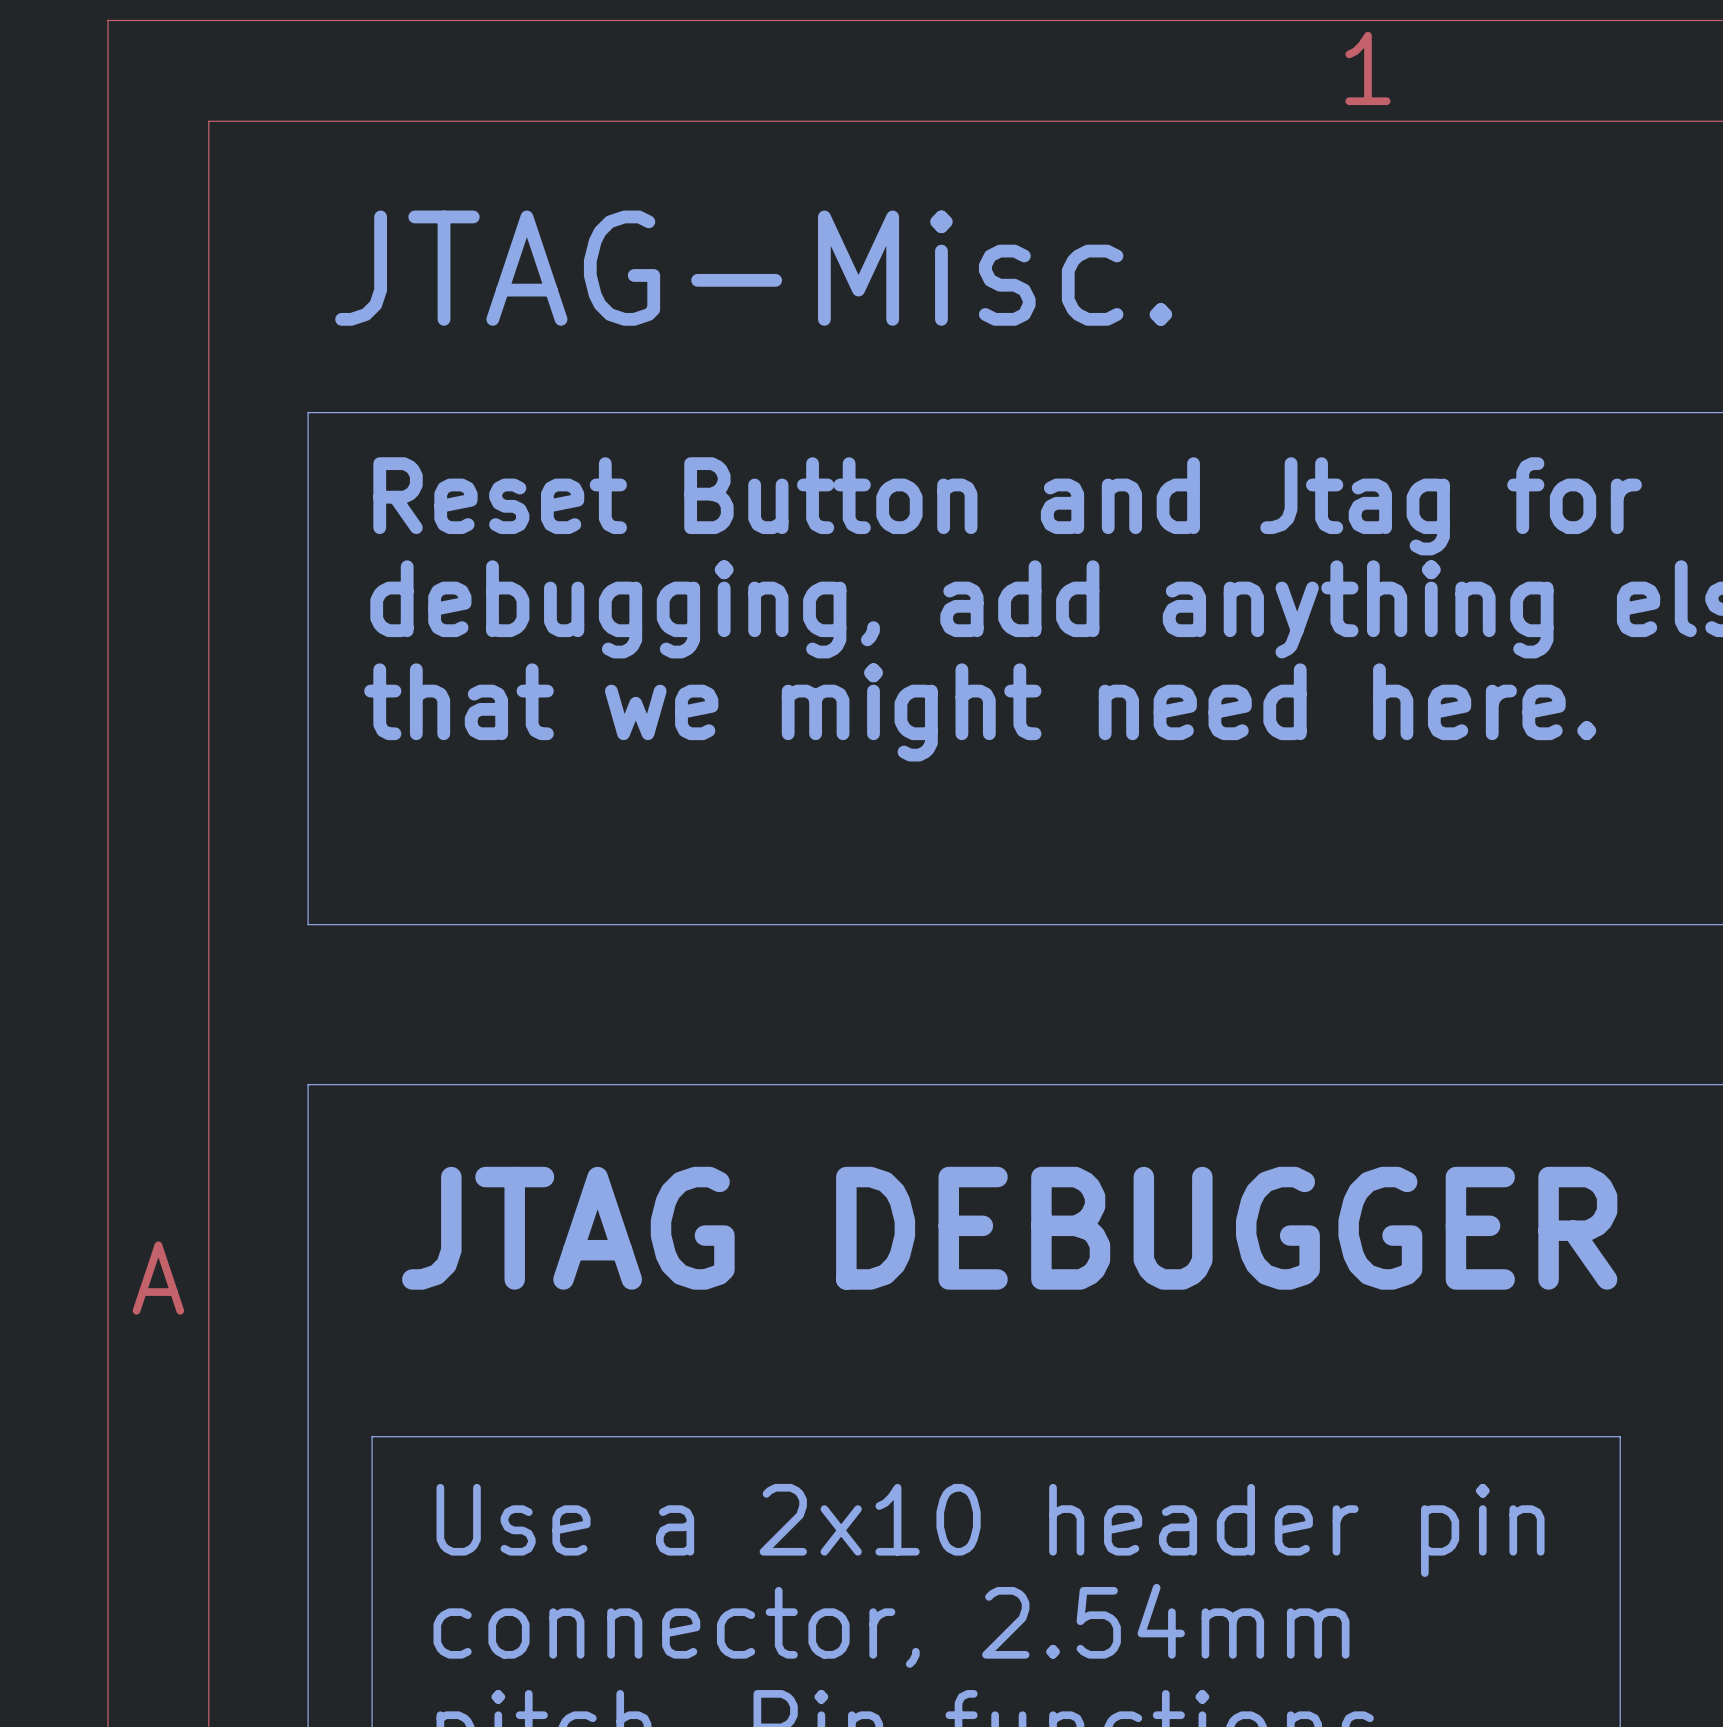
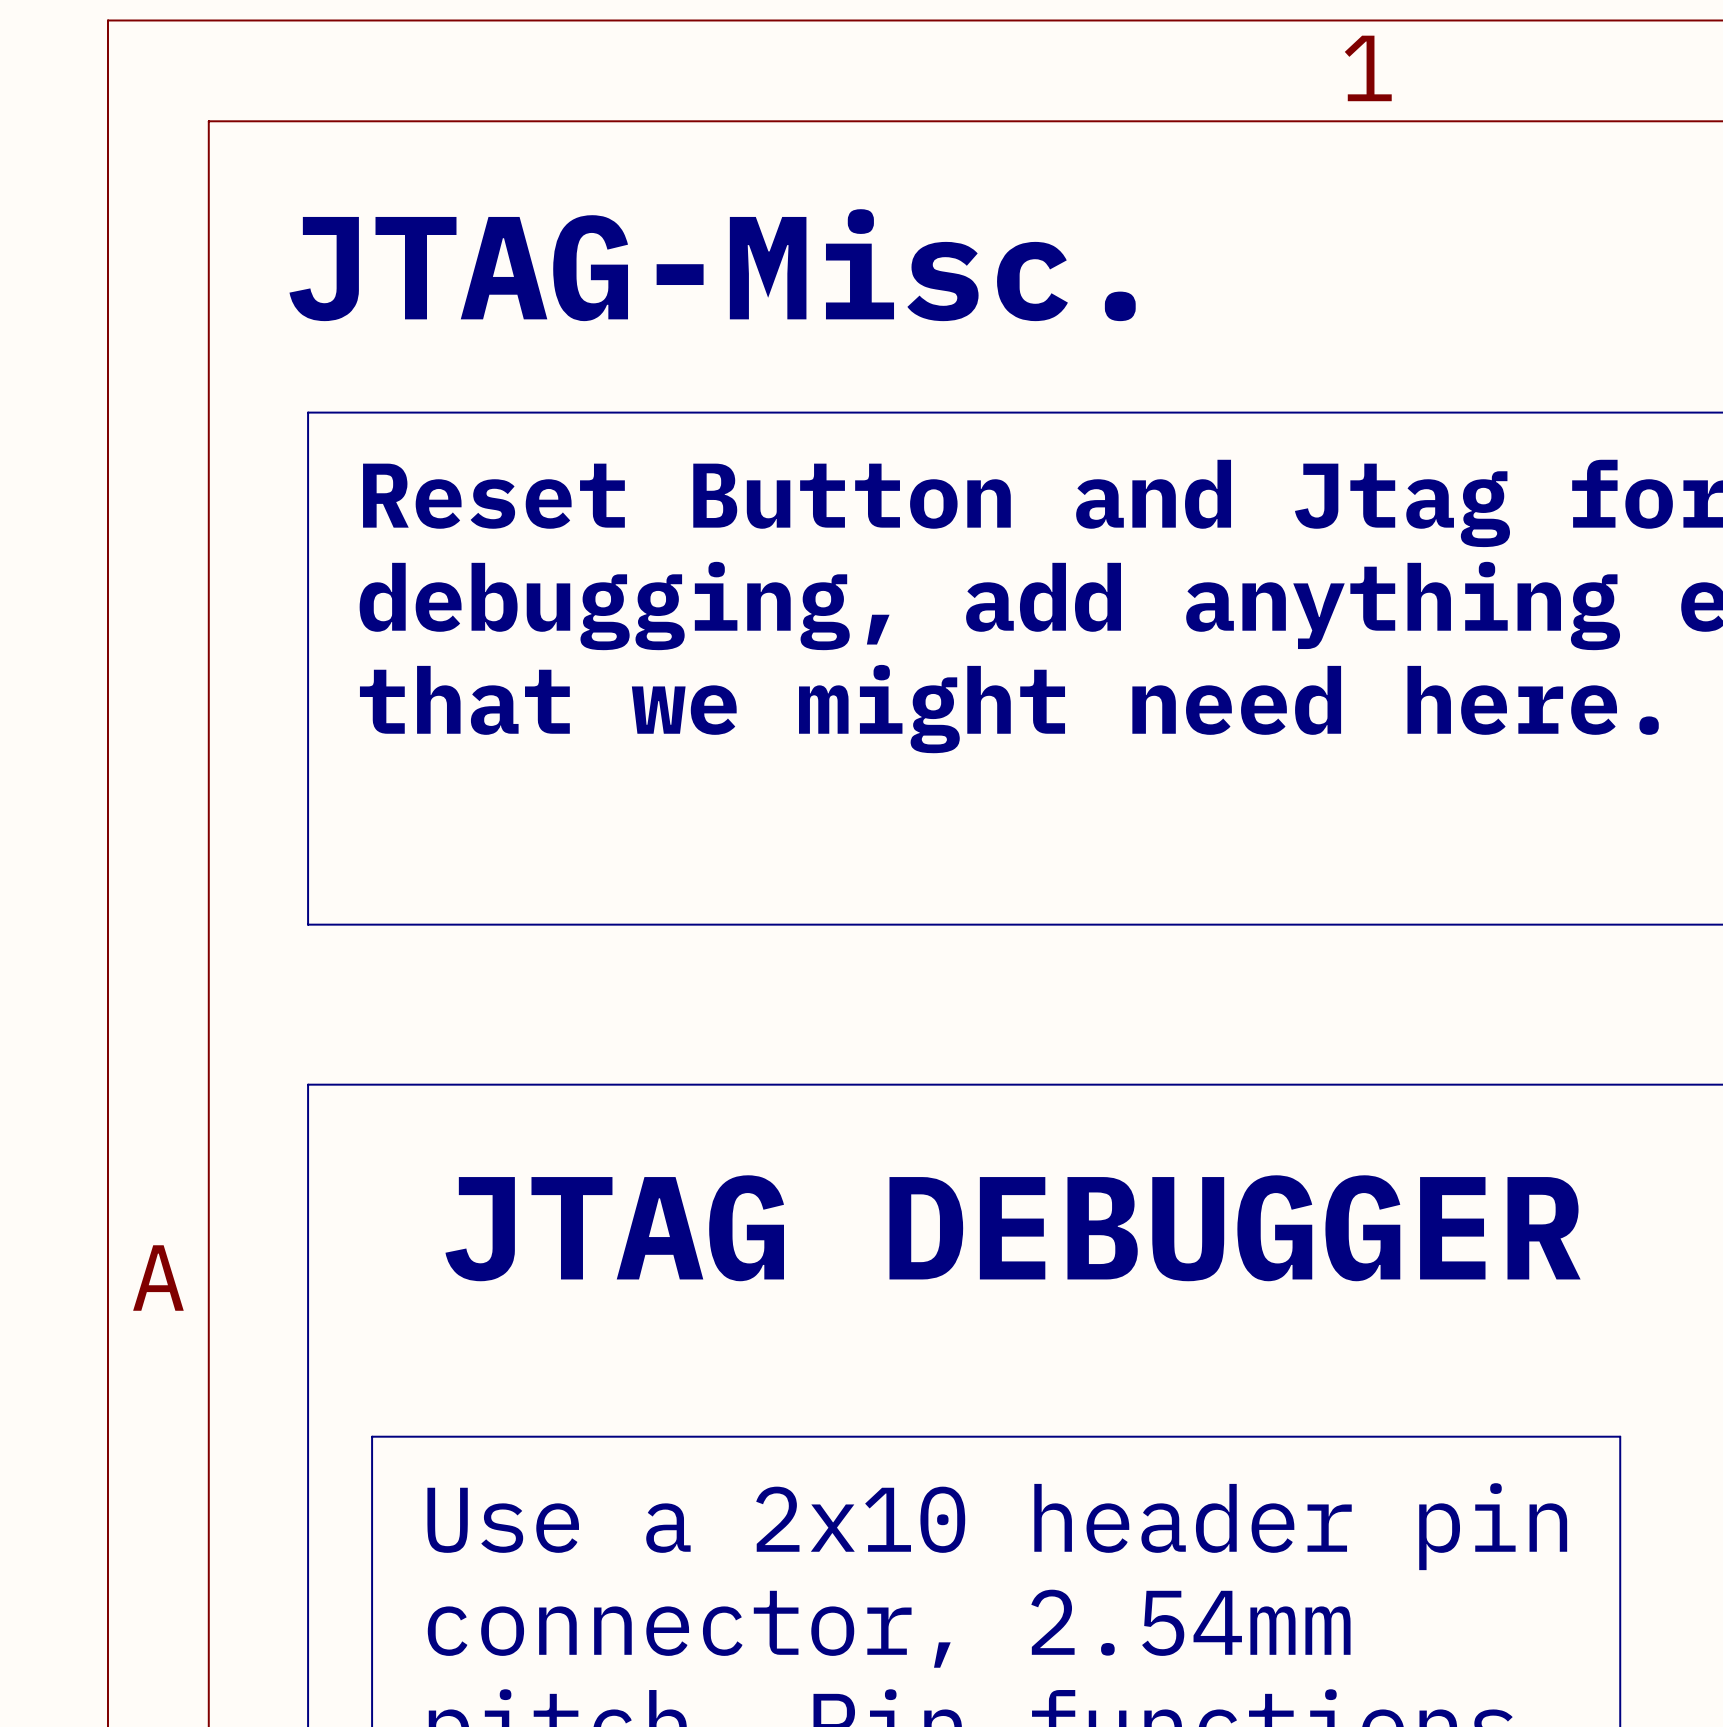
text position: JTAG-Misc. (753, 268) -> JTAG-Misc. (712, 265)

